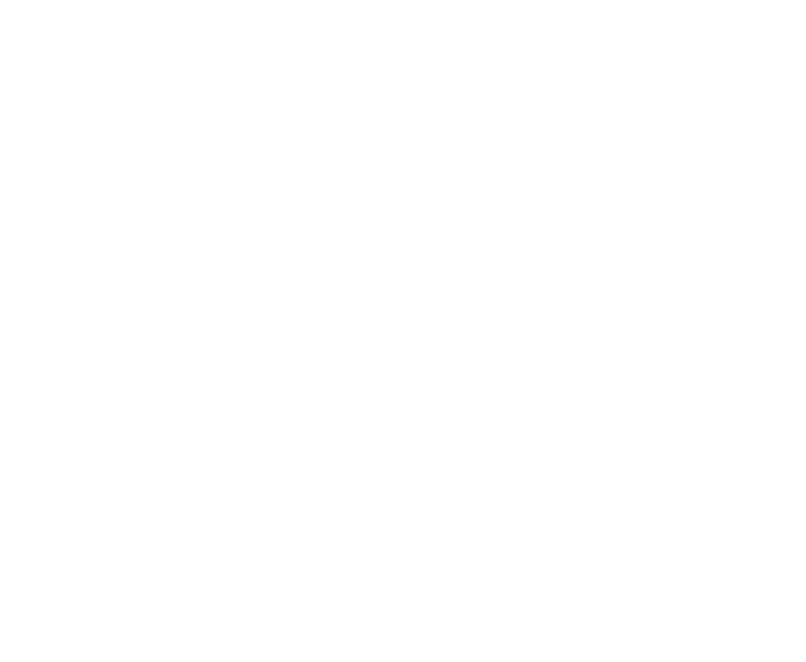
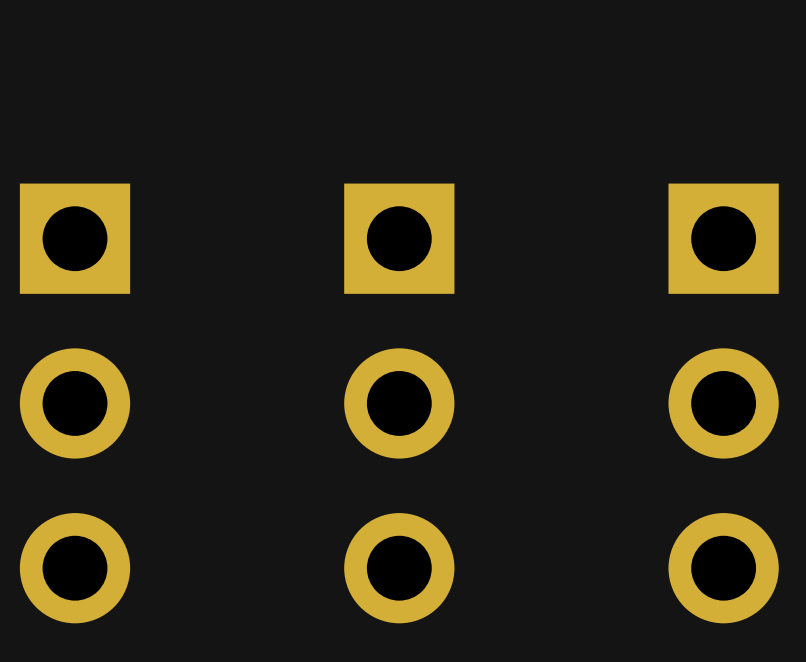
part: none -> (75, 403)
part: none -> (399, 403)
part: none -> (723, 403)

